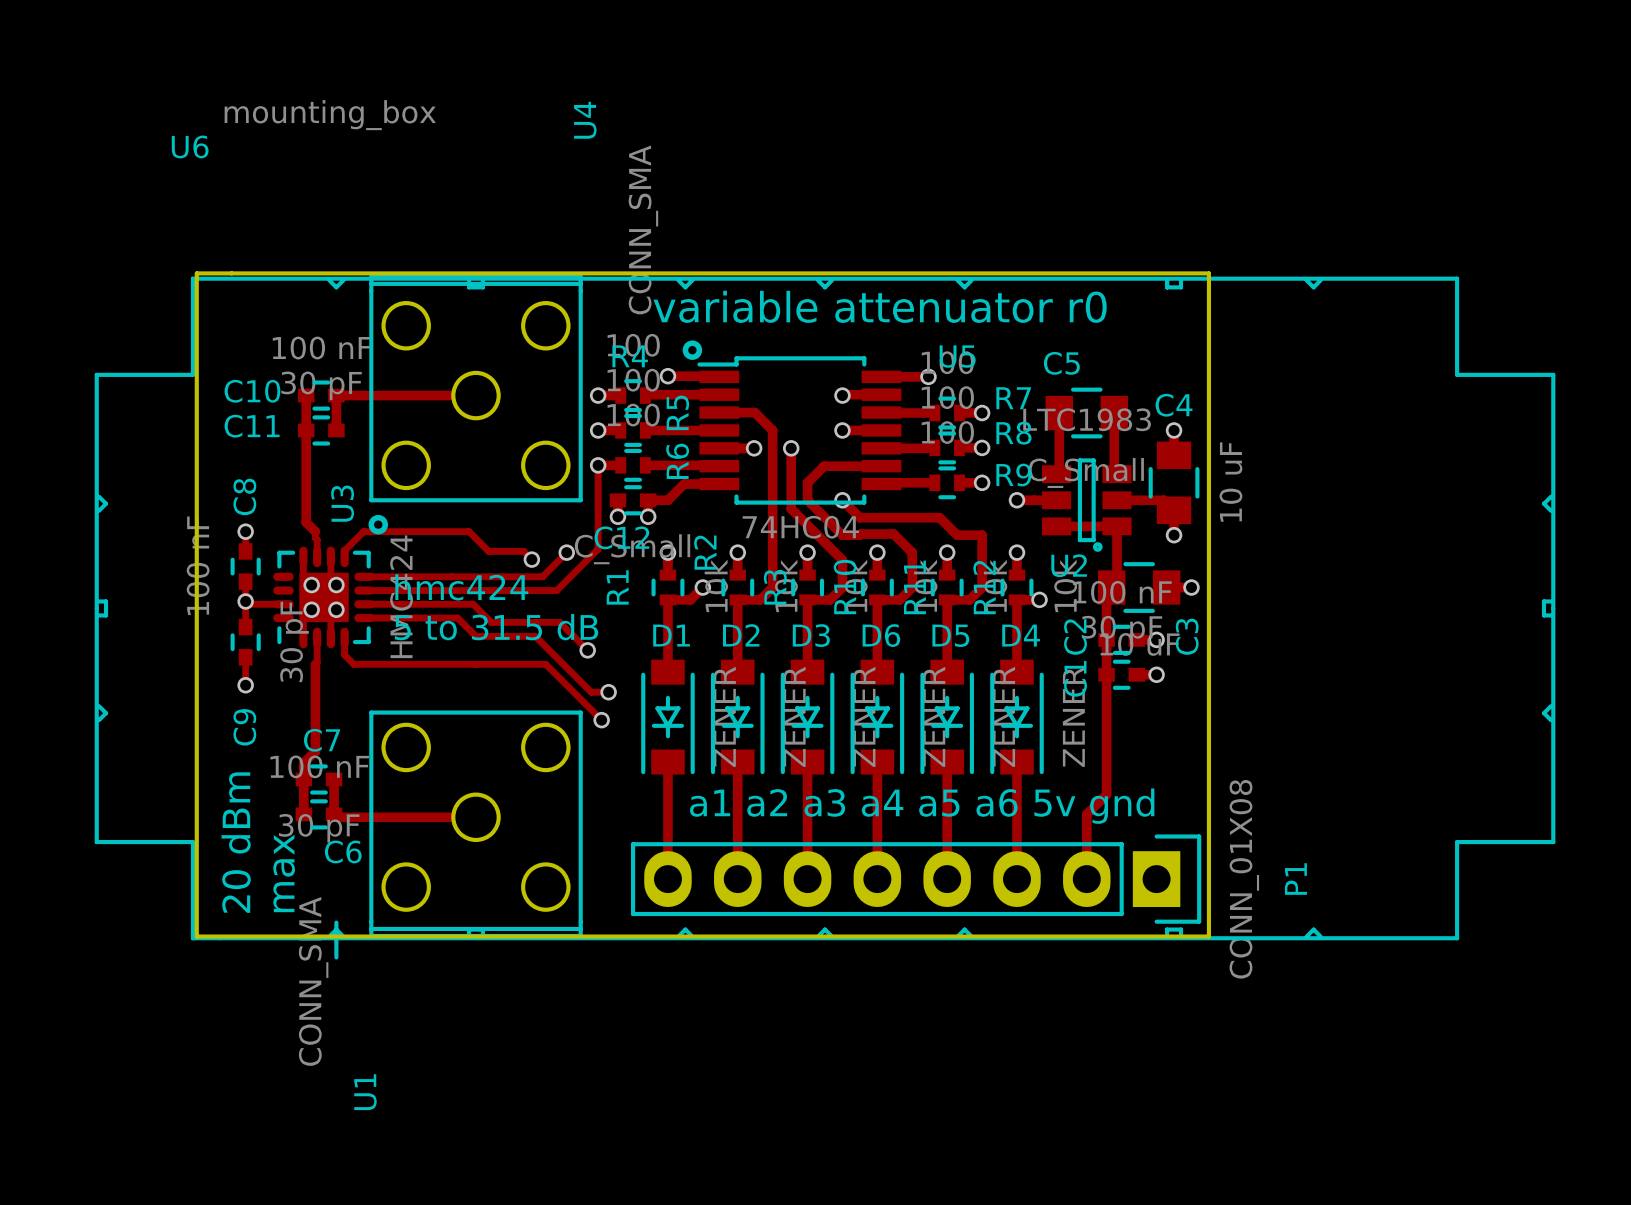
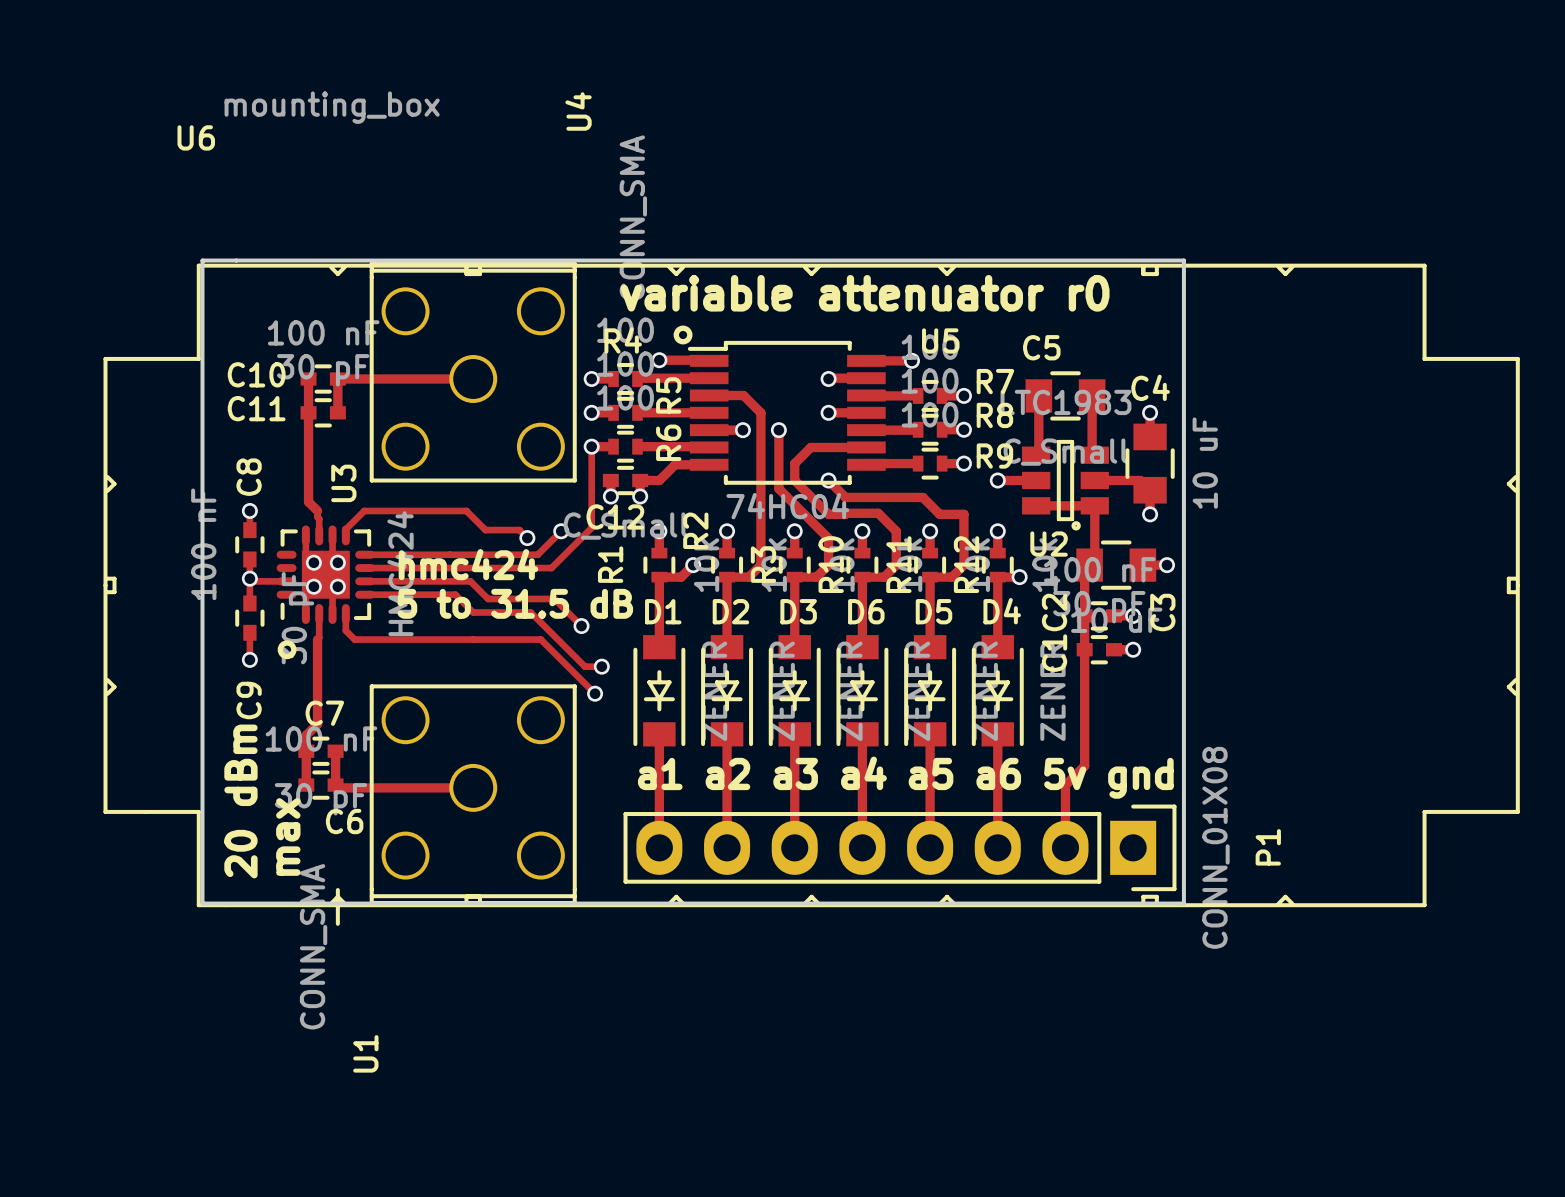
drawing position: (378, 524) -> (287, 649)

